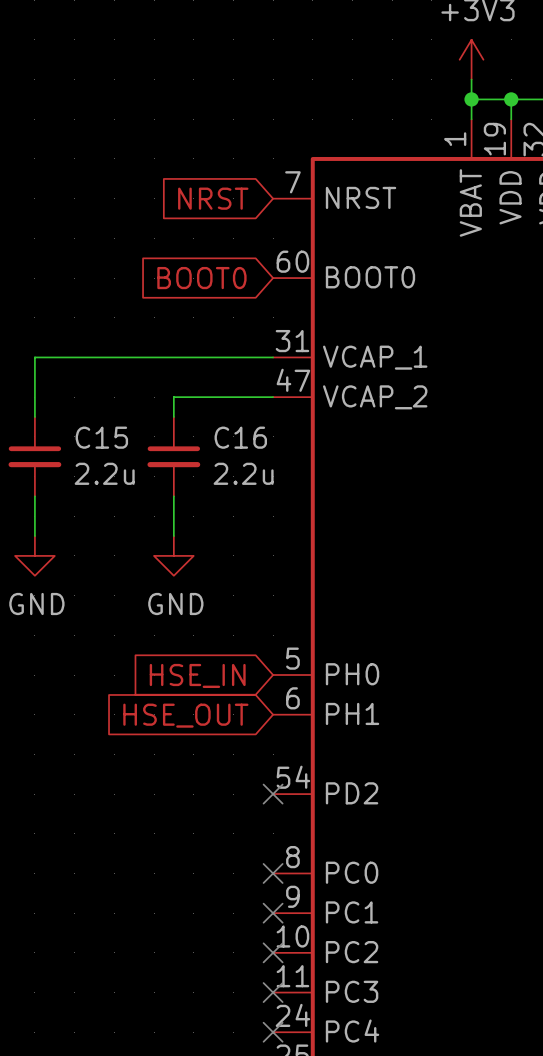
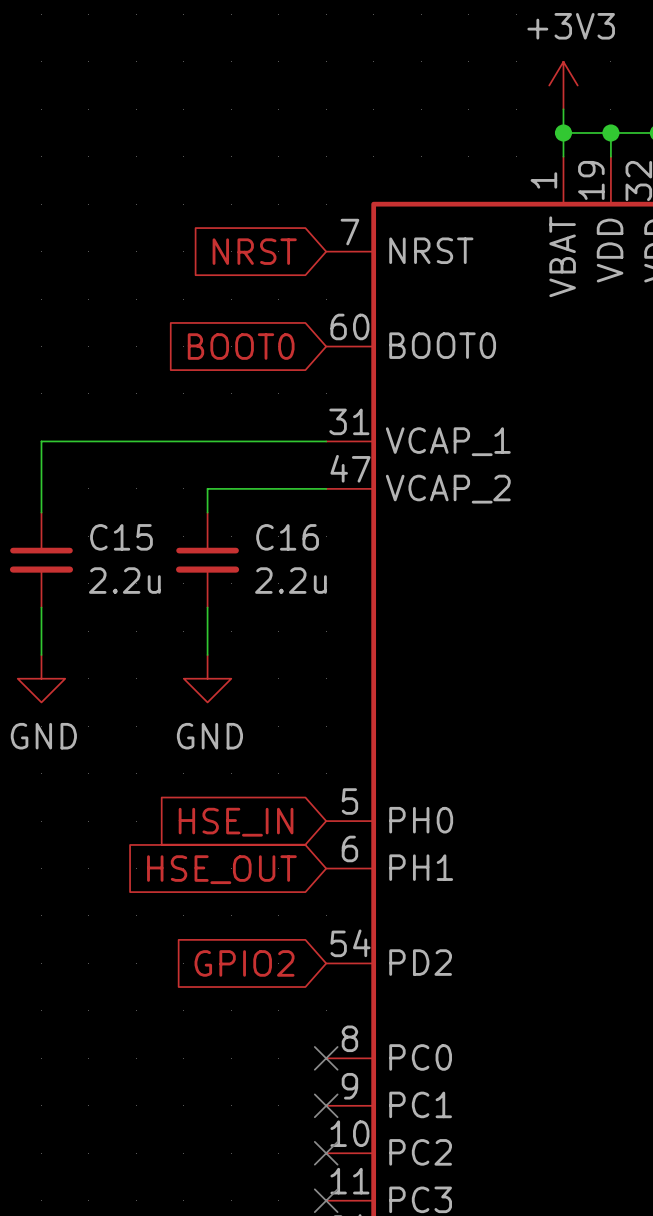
global label: none -> GPIO2 (244, 963)
no-connect mark: (273, 794) -> none

